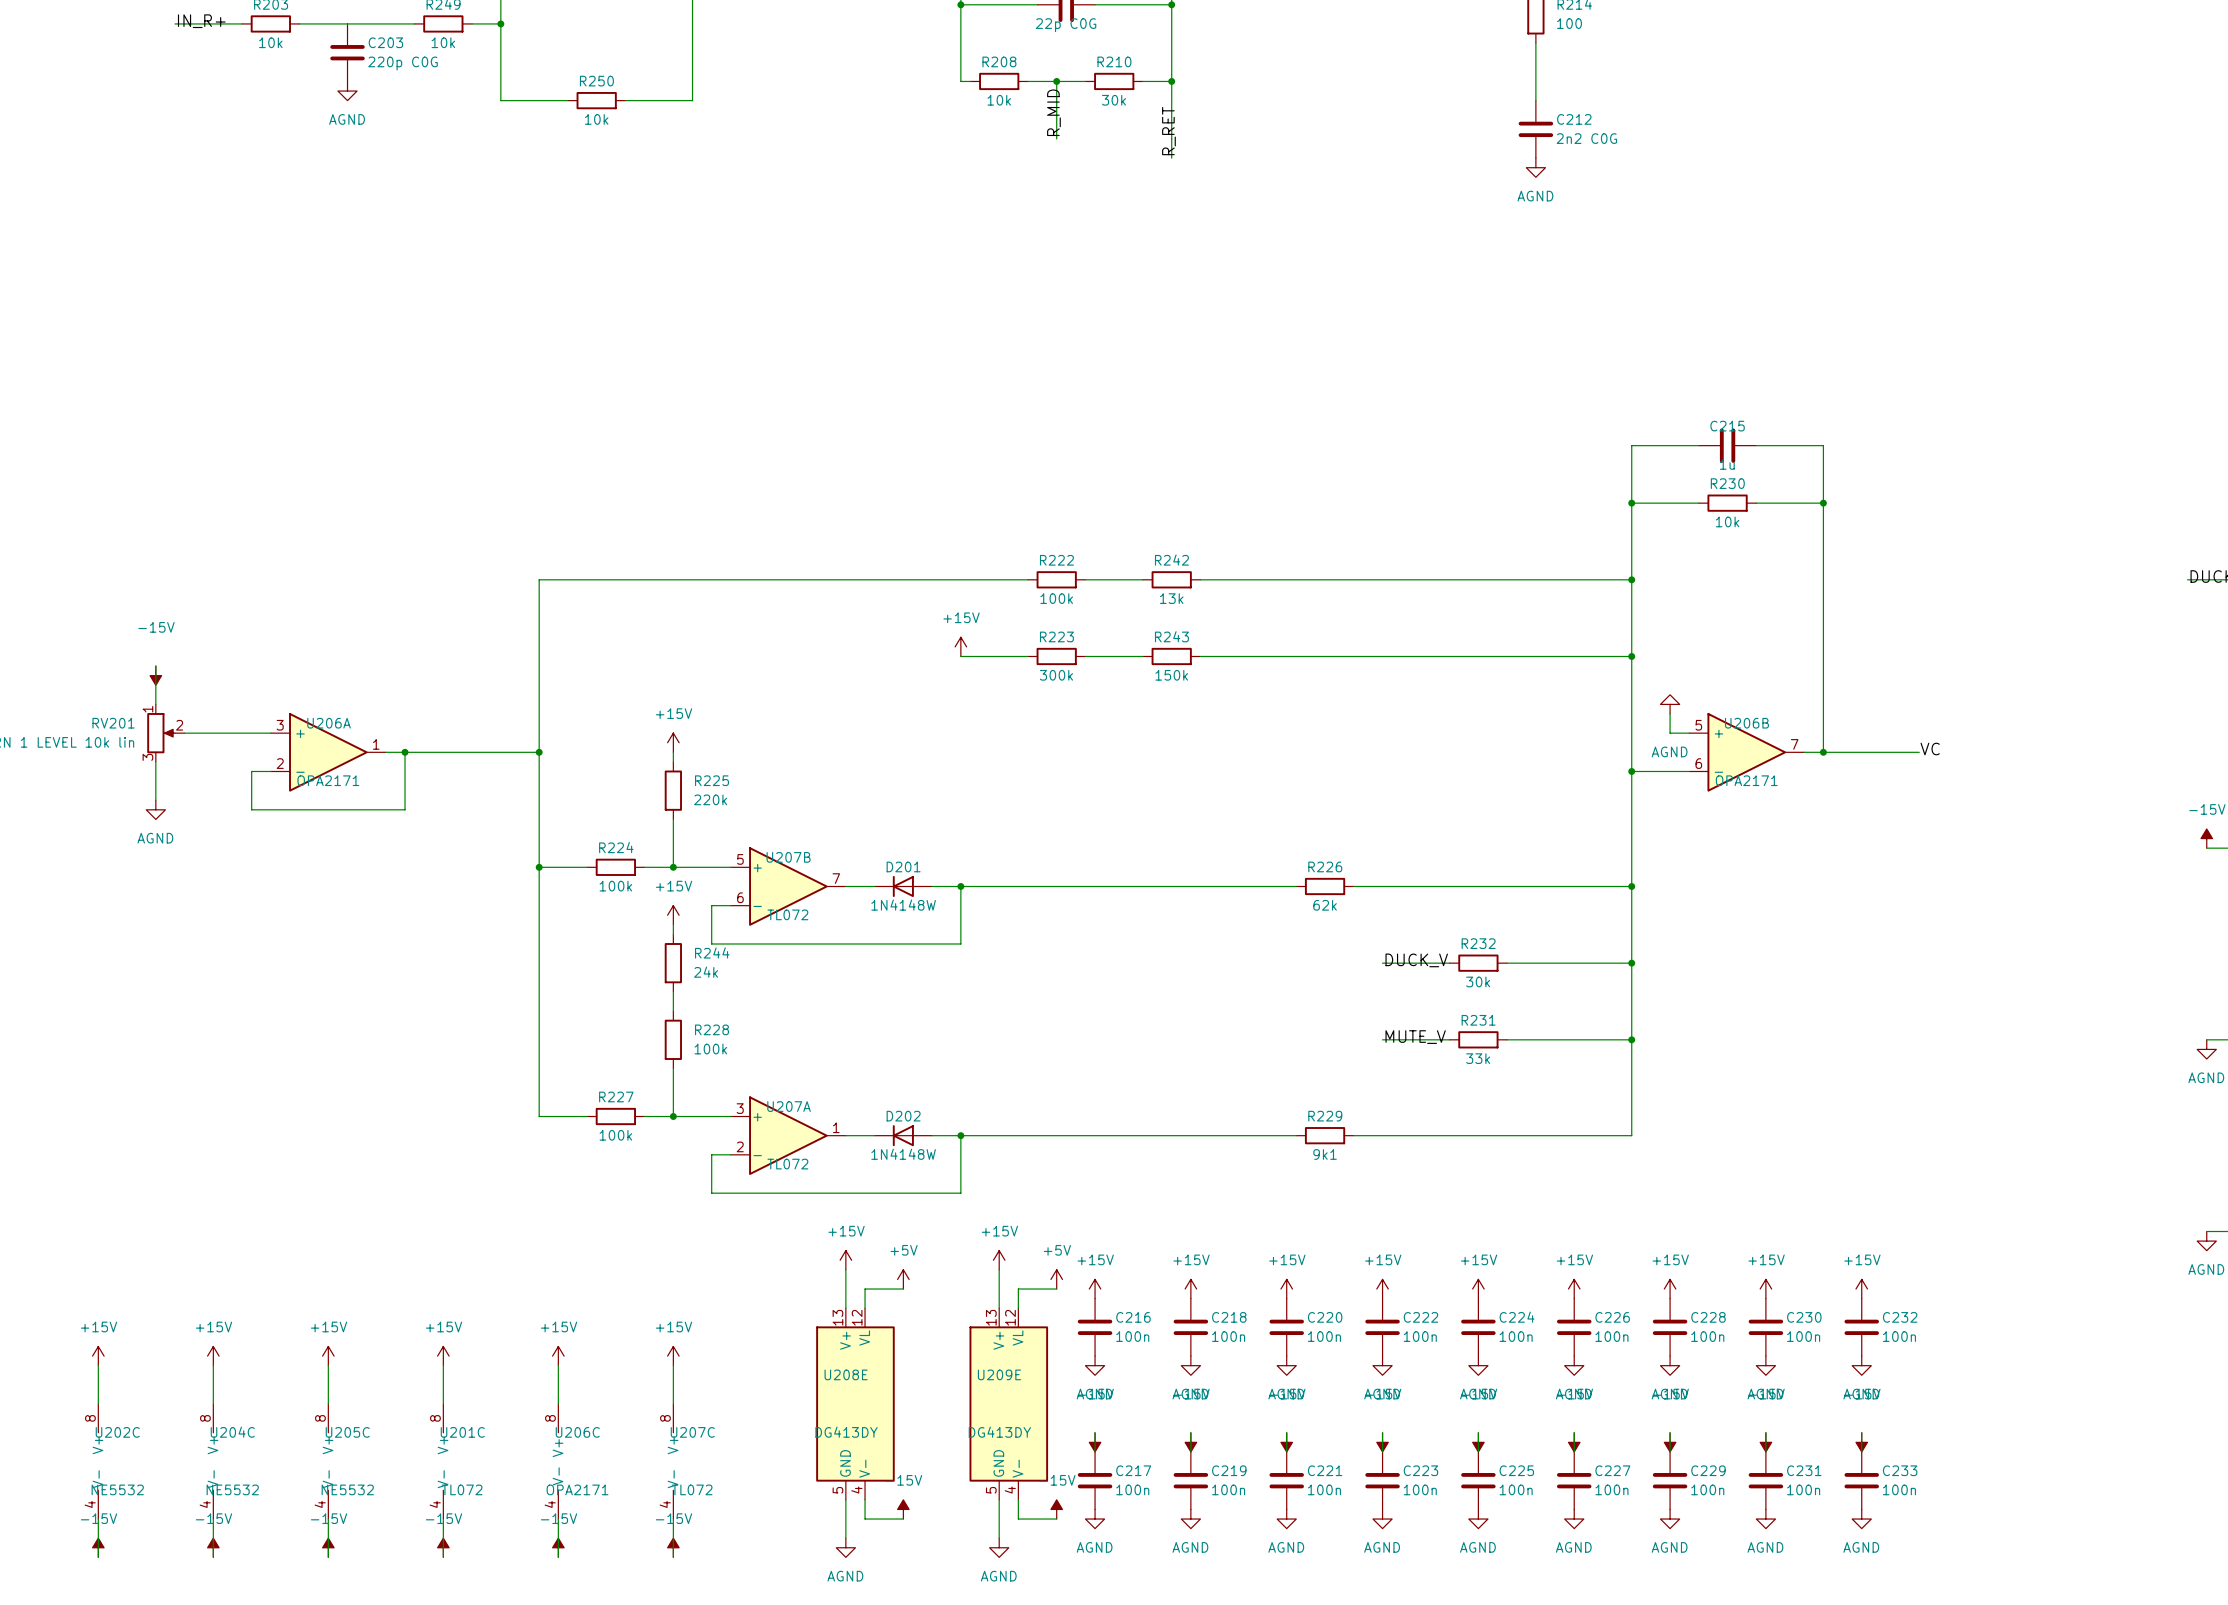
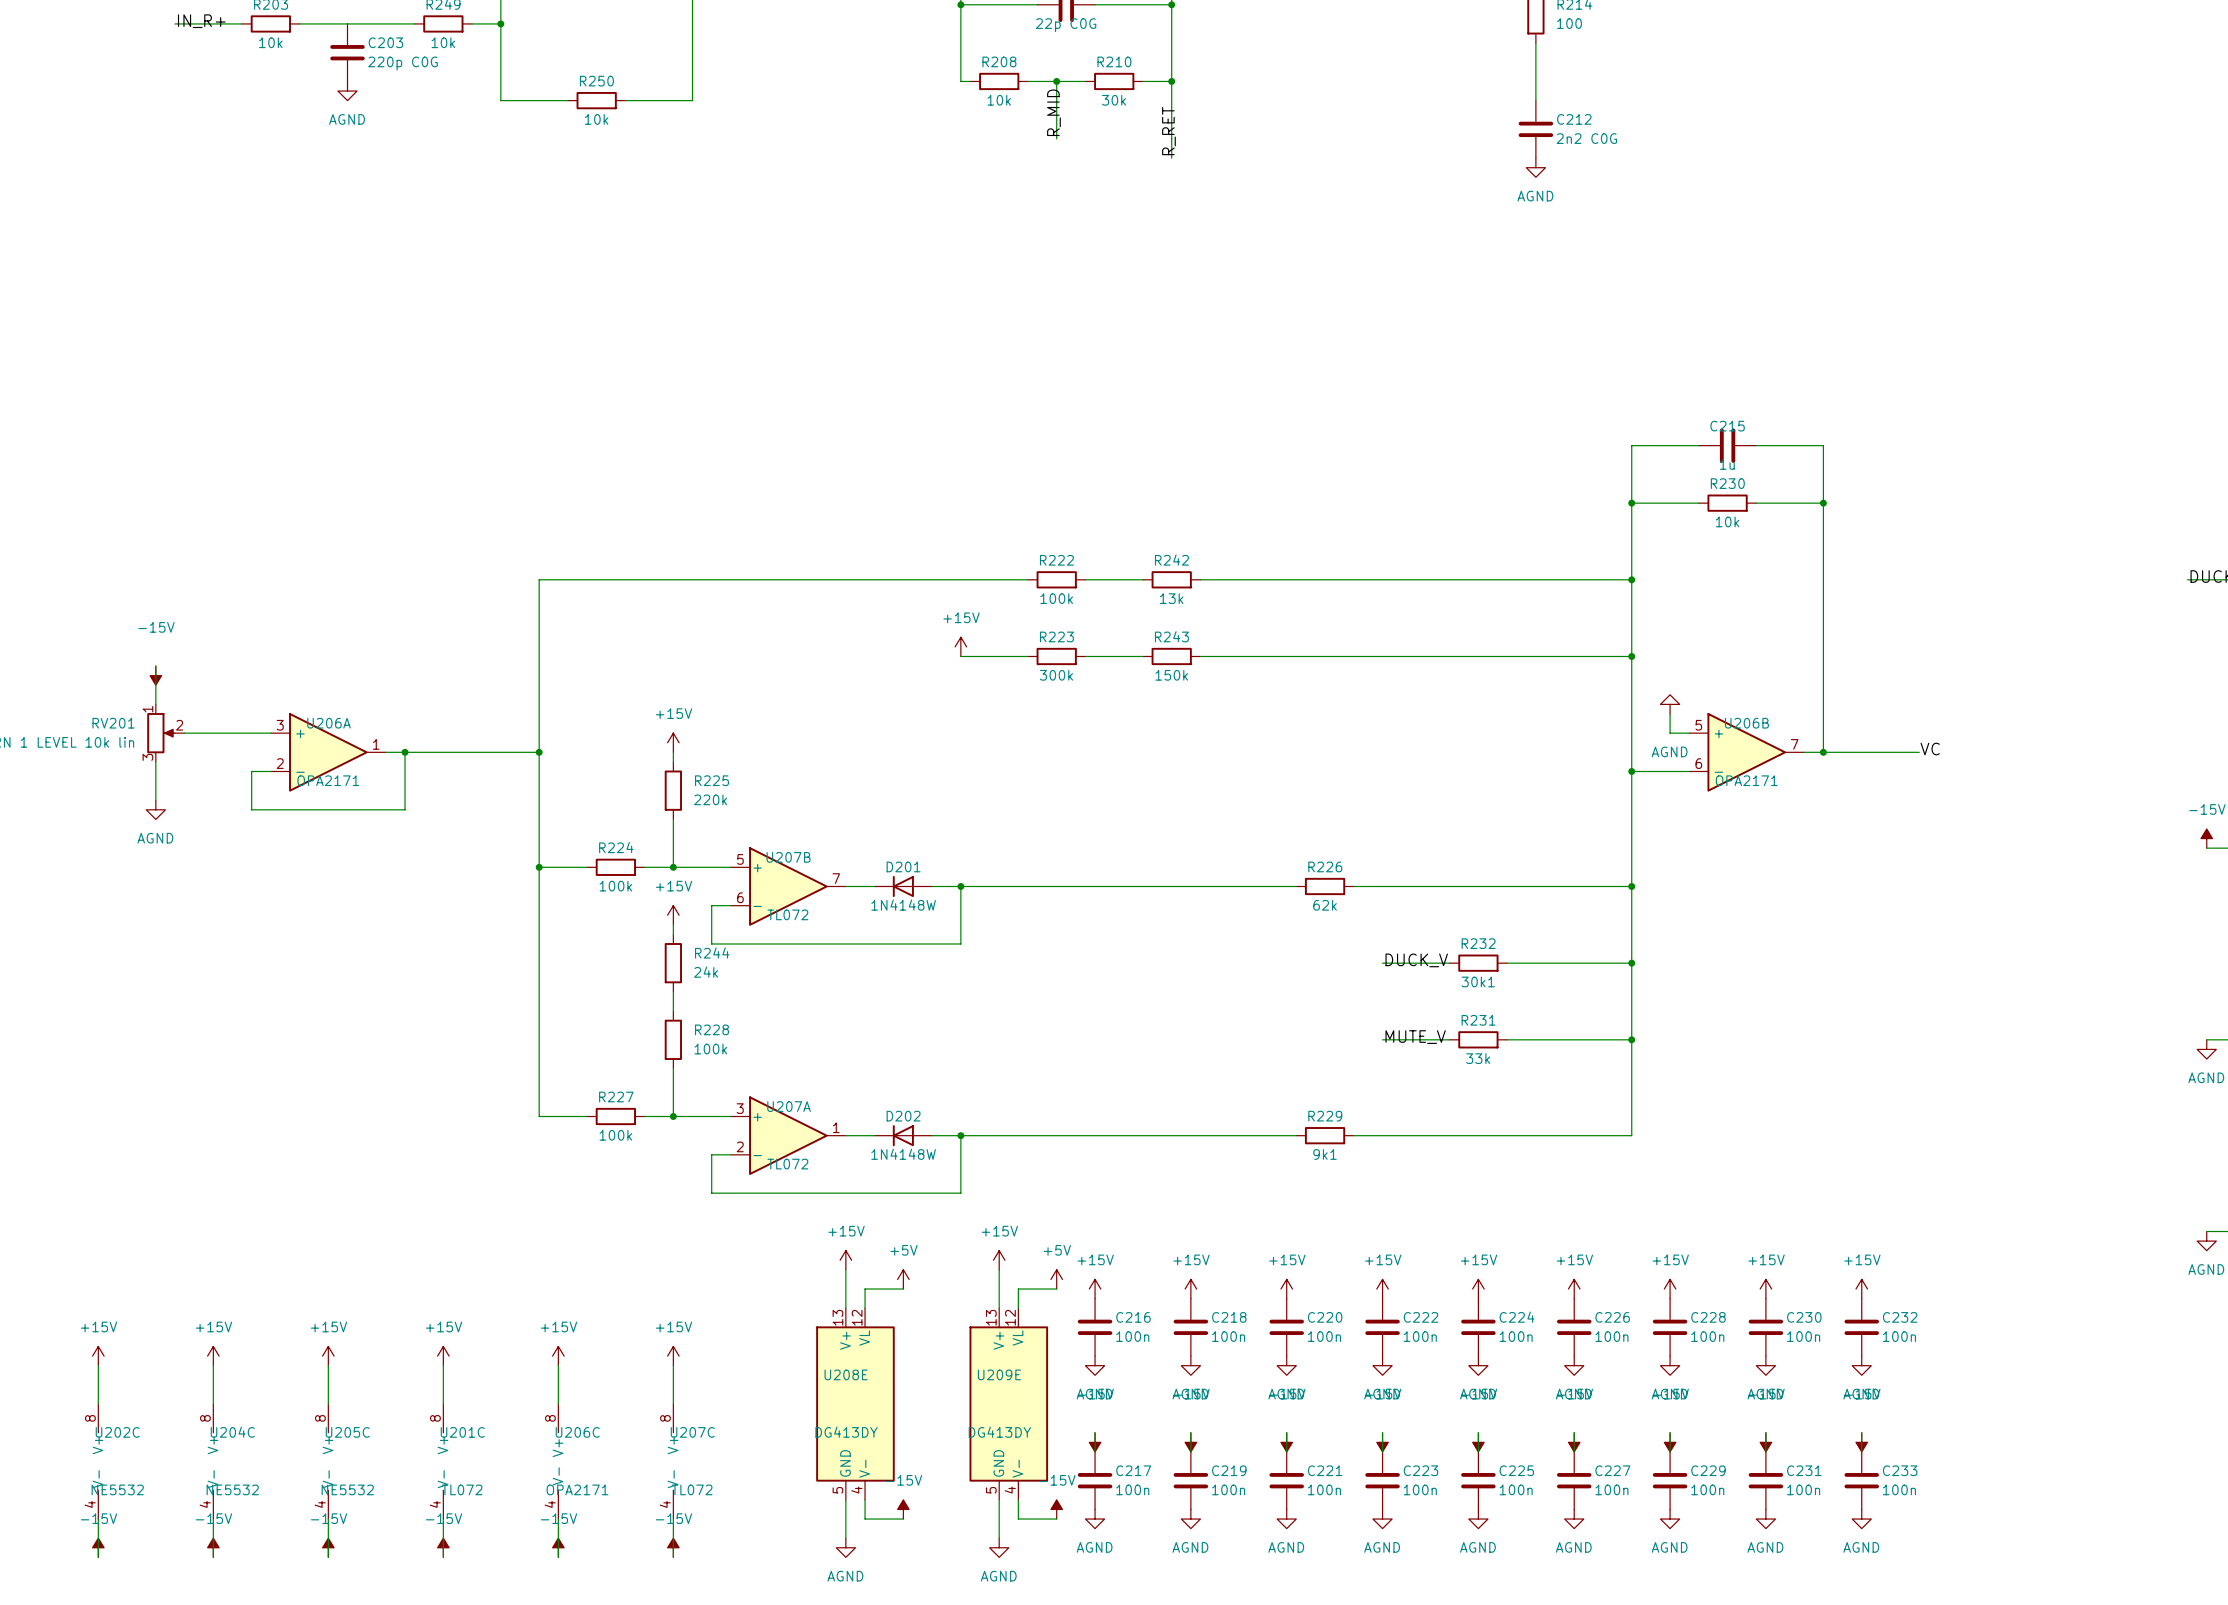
R232 value: 30k (1478, 981) -> 30k1 (1478, 981)

